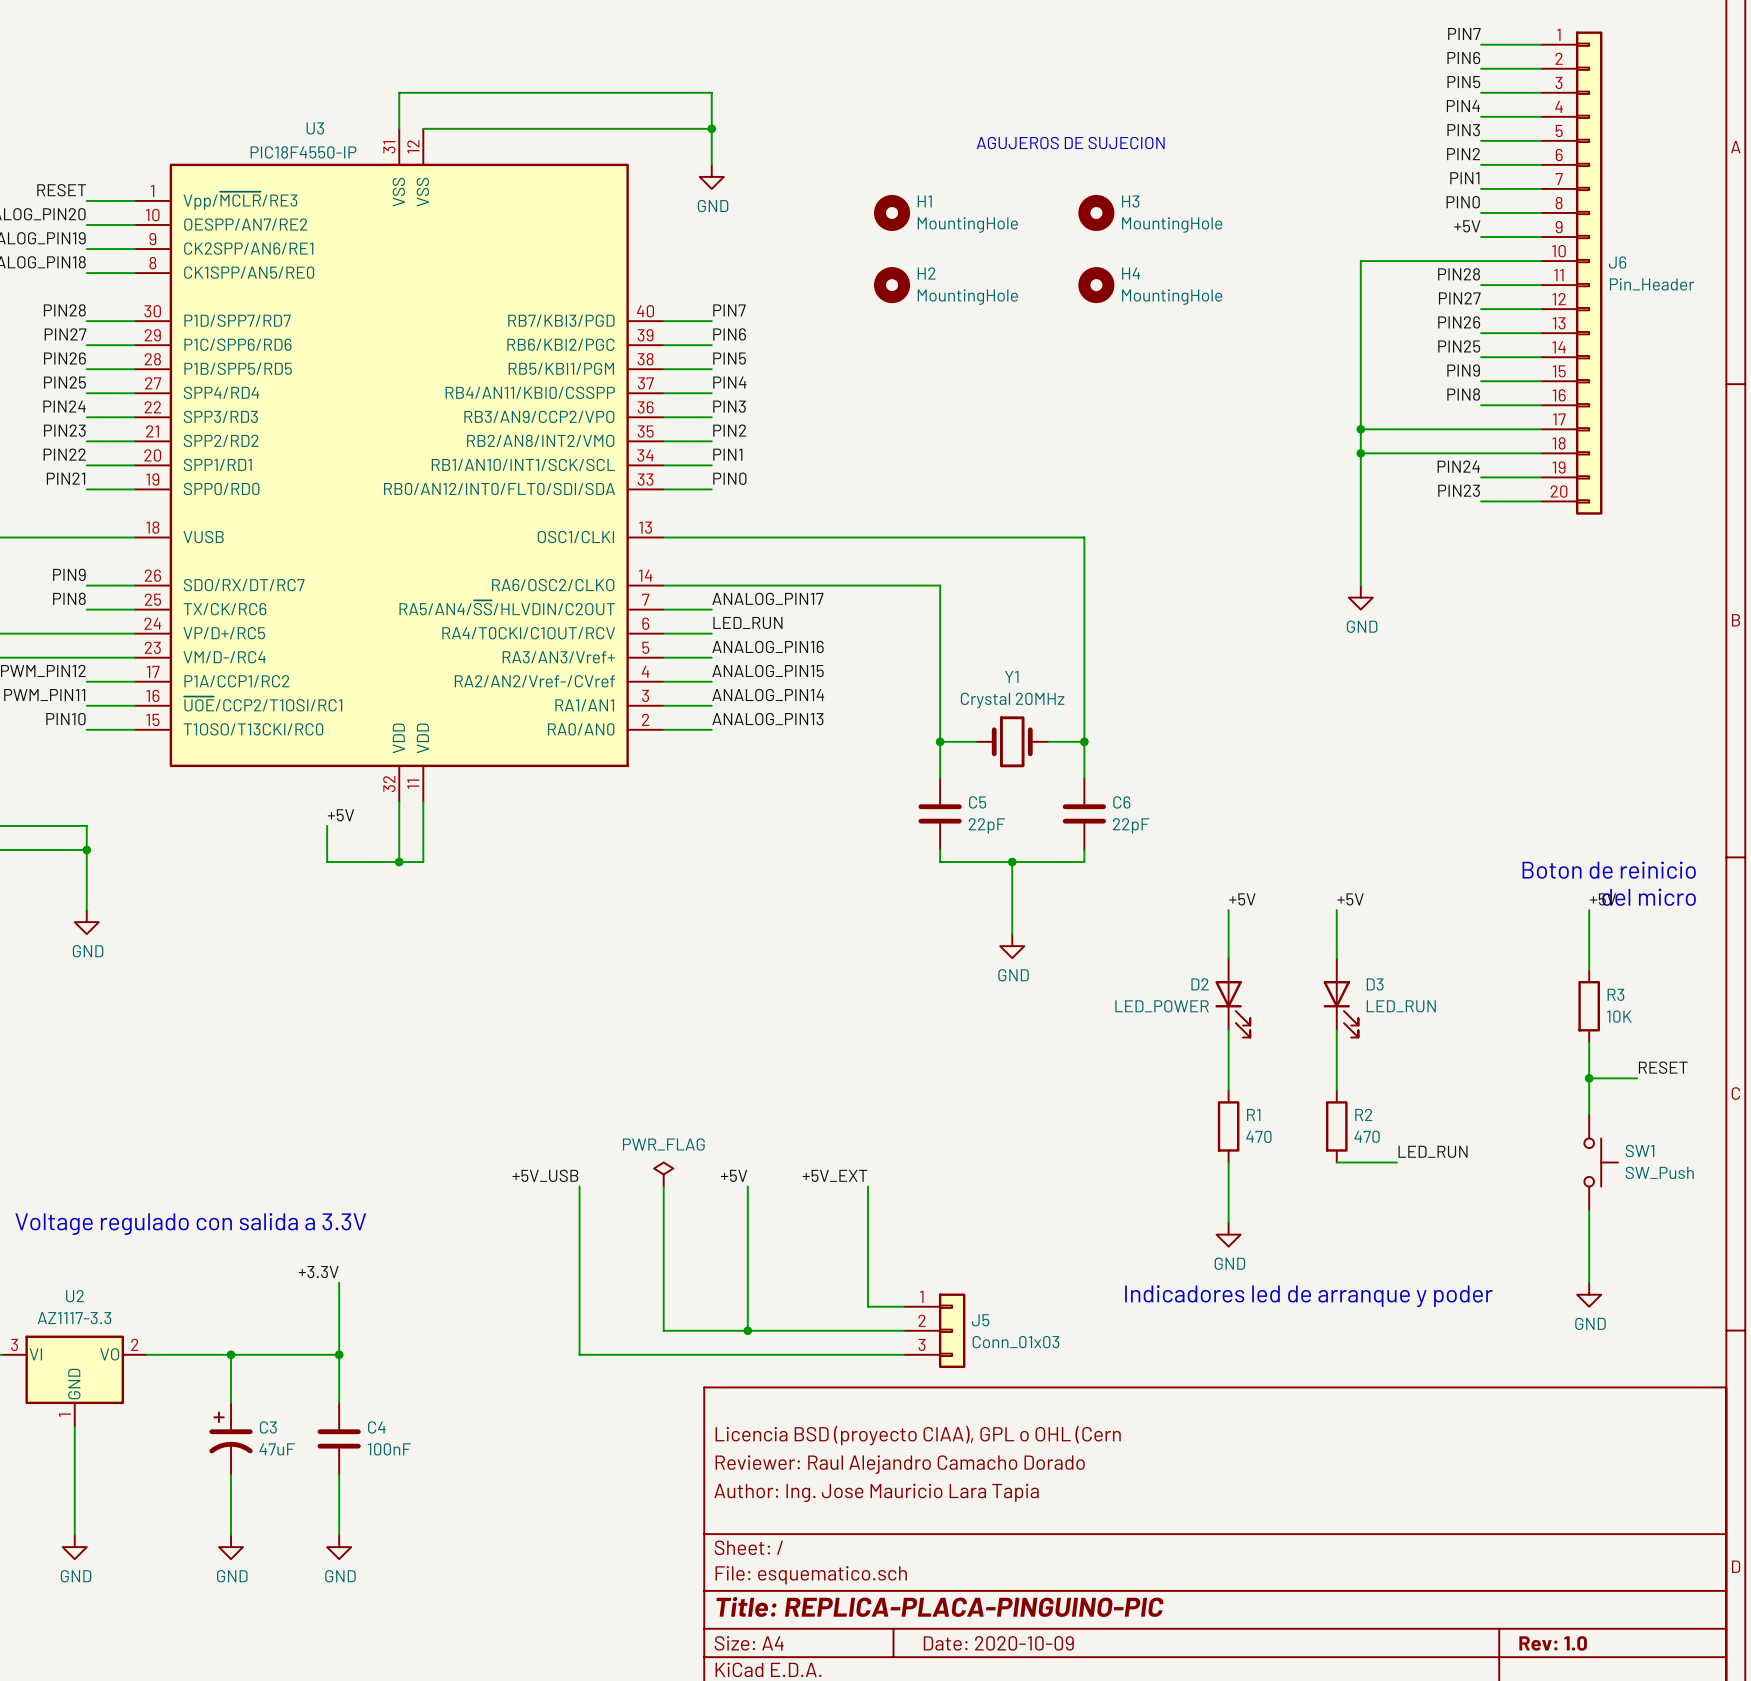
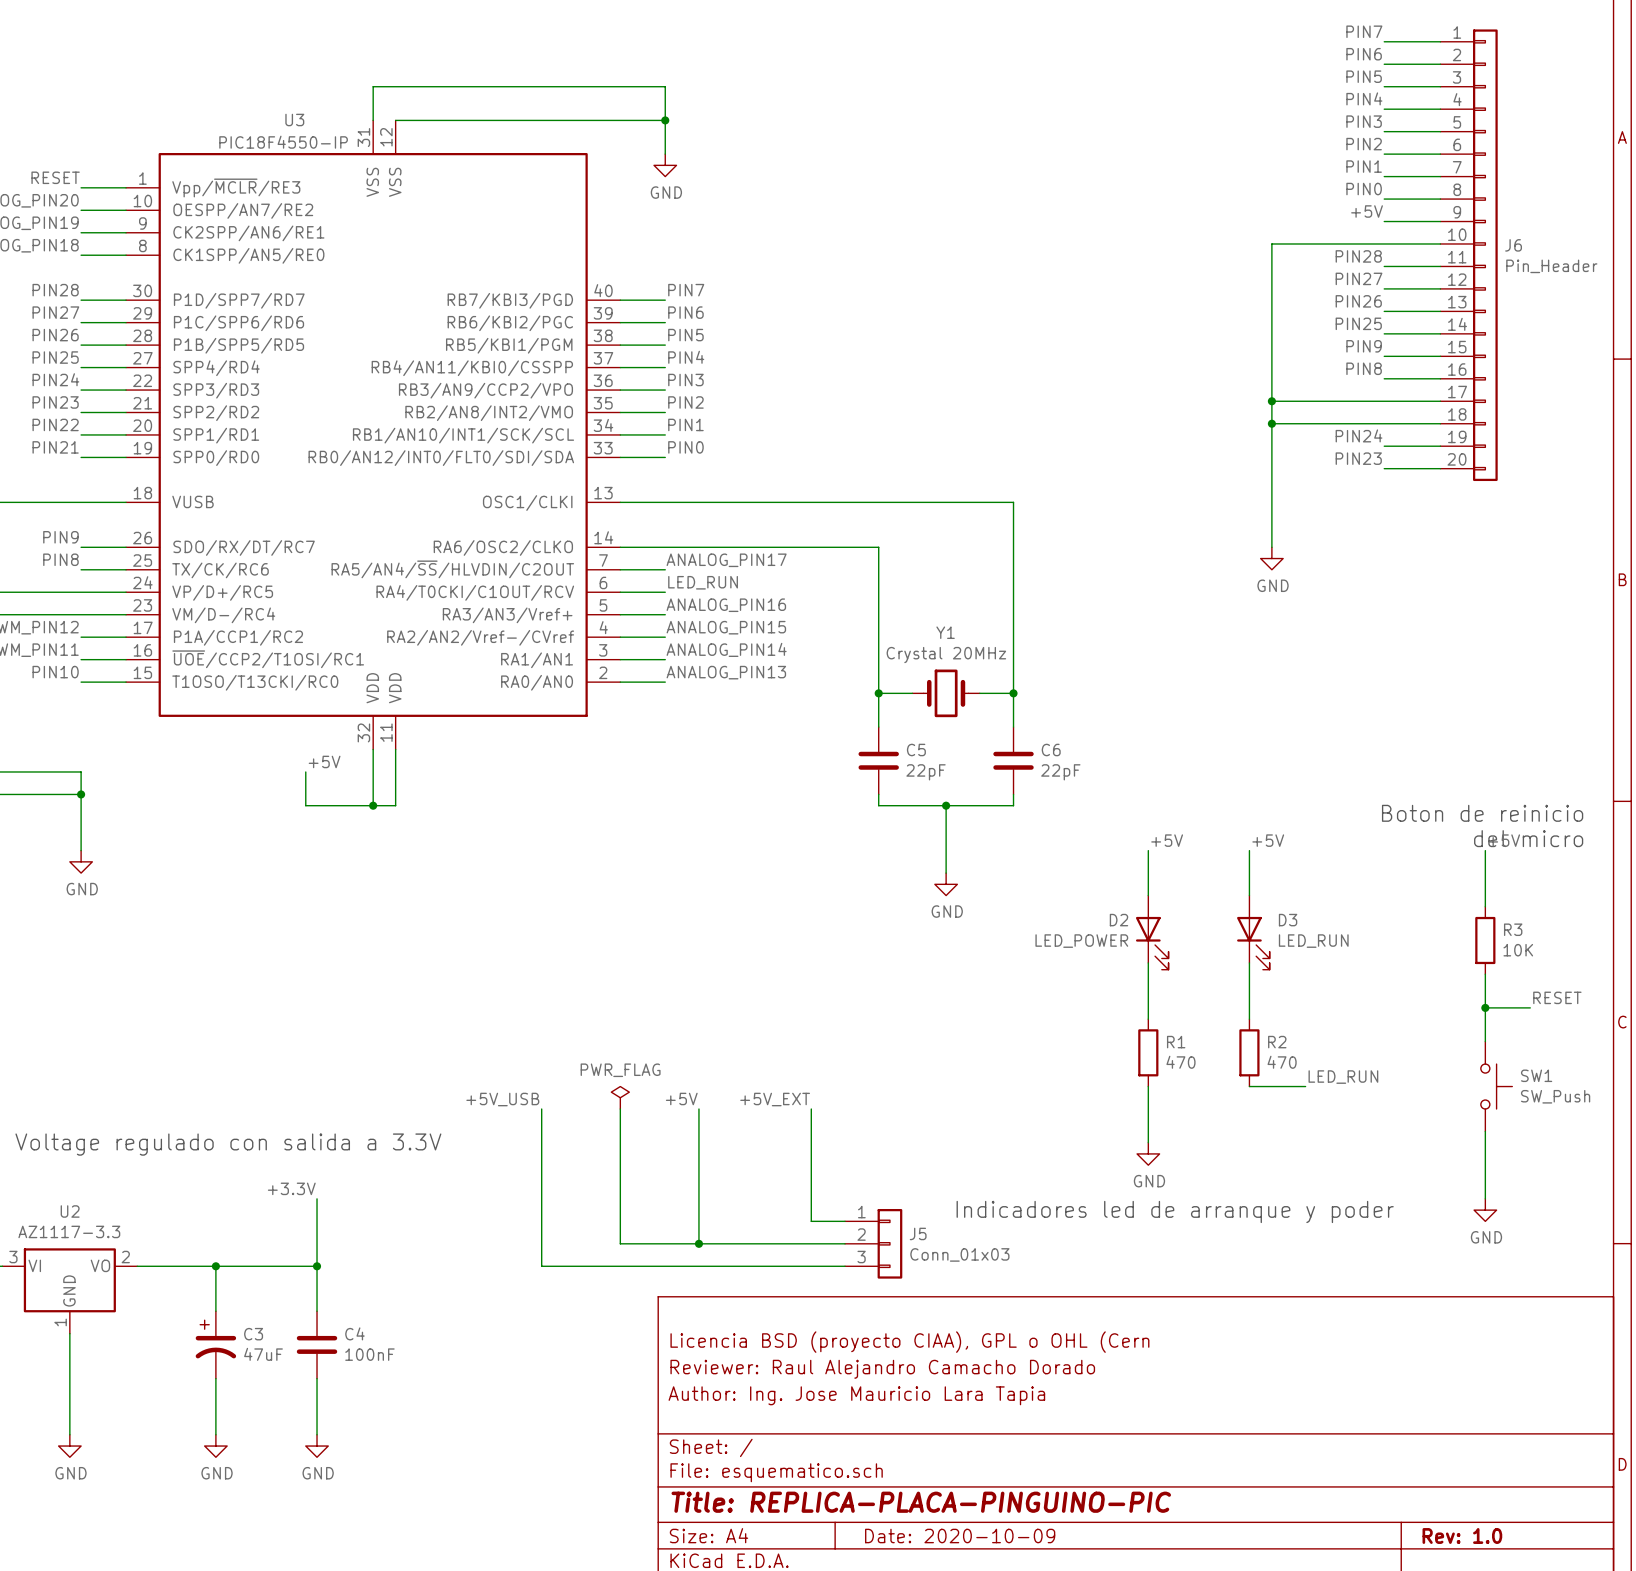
text: AGUJEROS DE SUJECION (1070, 143) -> none
H1: MountingHole (892, 212) -> none
H3: MountingHole (1096, 212) -> none
H2: MountingHole (892, 285) -> none
H4: MountingHole (1096, 285) -> none

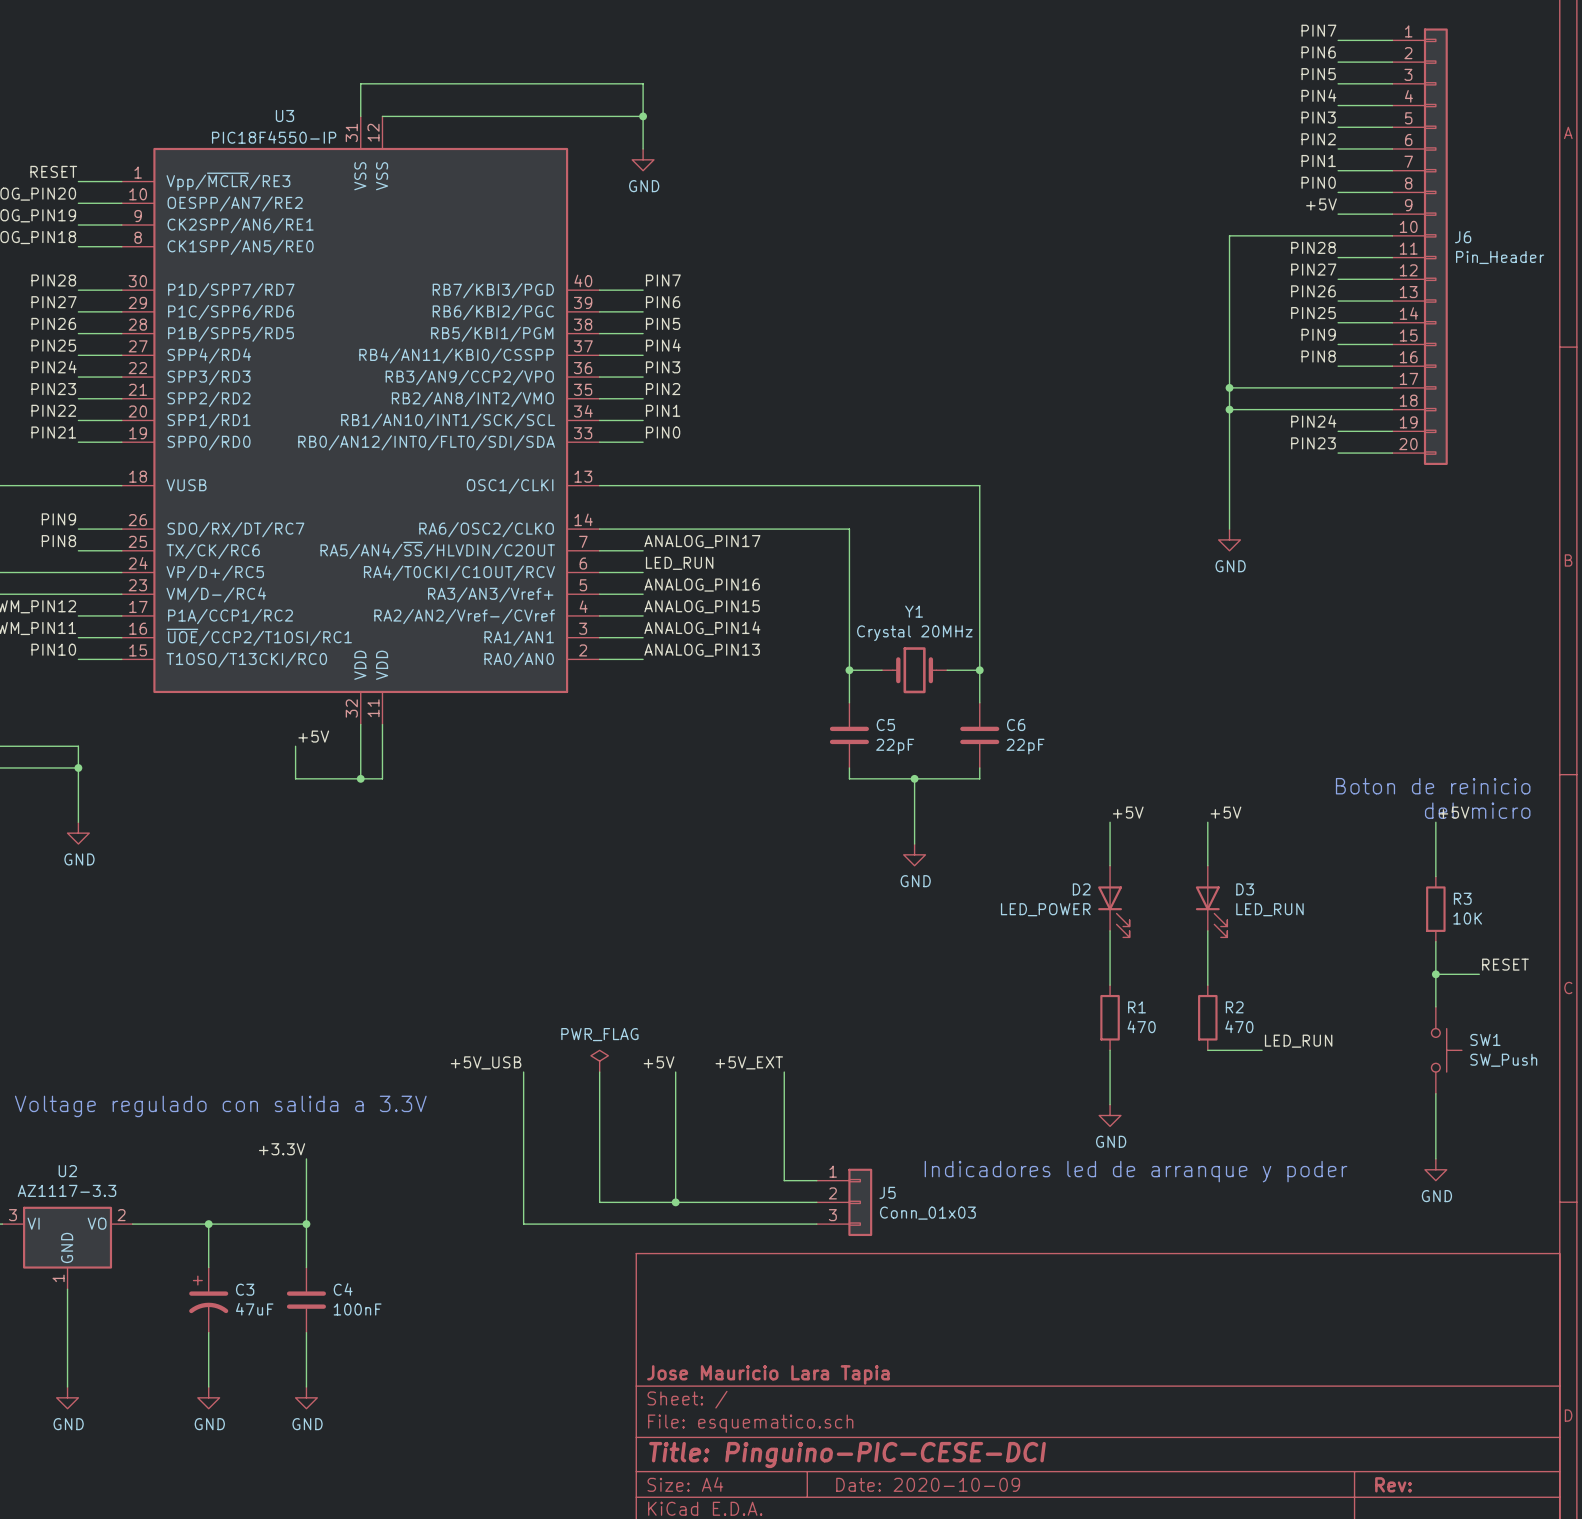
title block: Licencia BSD (proyecto CIAA), GPL o OHL (Cern (909, 1342) -> none
title block: Reviewer: Raul Alejandro Camacho Dorado (882, 1369) -> none
title block: Author: Ing. Jose Mauricio Lara Tapia (856, 1395) -> Jose Mauricio Lara Tapia (768, 1374)
title block: Title: REPLICA-PLACA-PINGUINO-PIC (921, 1502) -> Title: Pinguino-PIC-CESE-DCI (847, 1455)
title block: Rev: 1.0 (1462, 1536) -> Rev: (1393, 1484)

